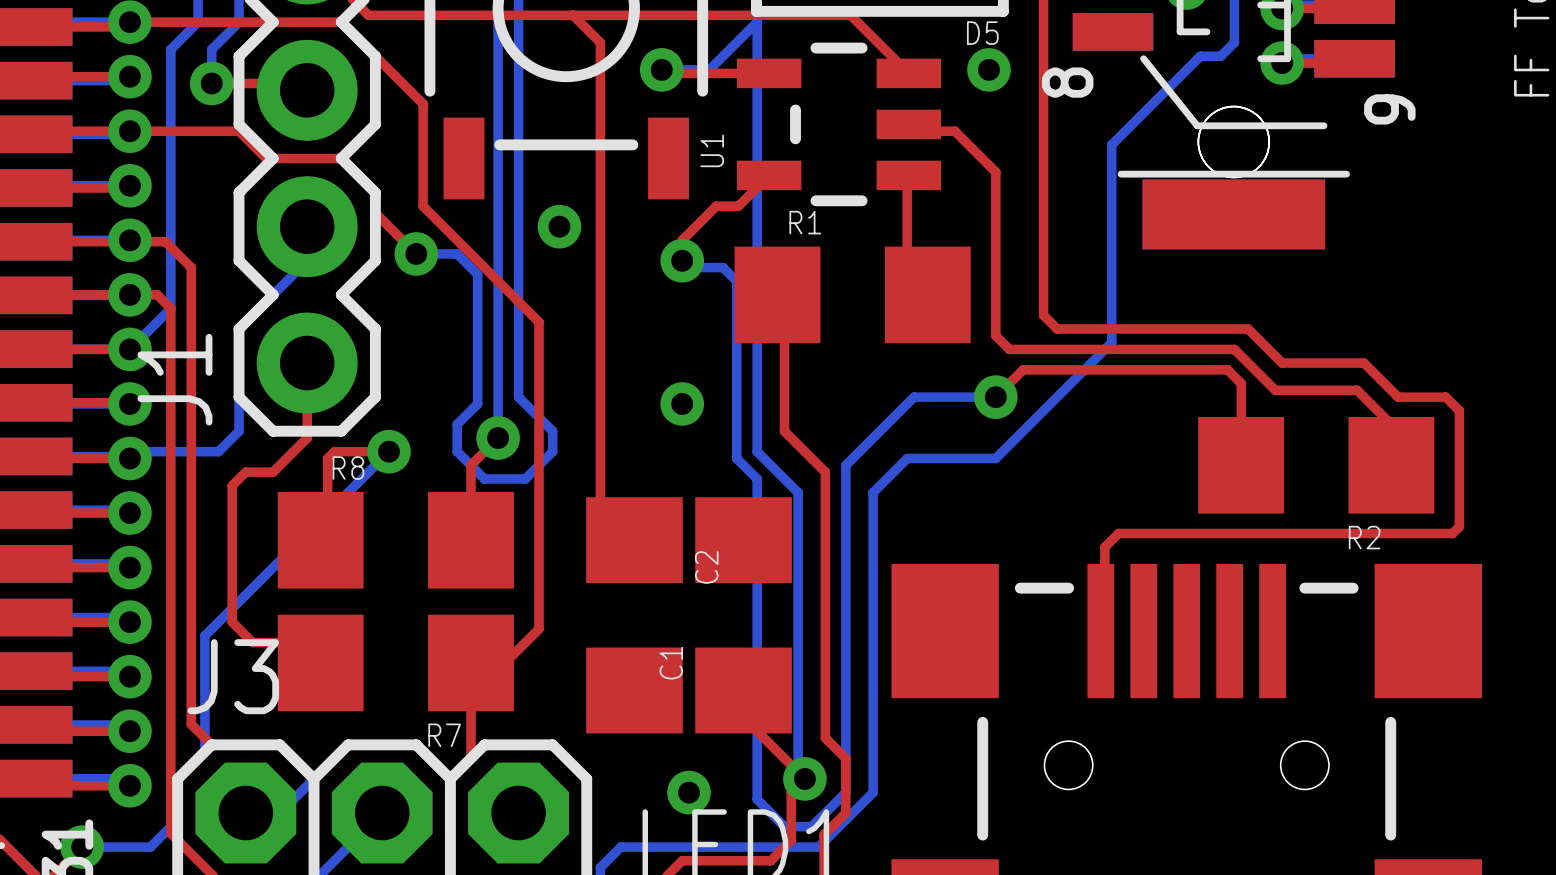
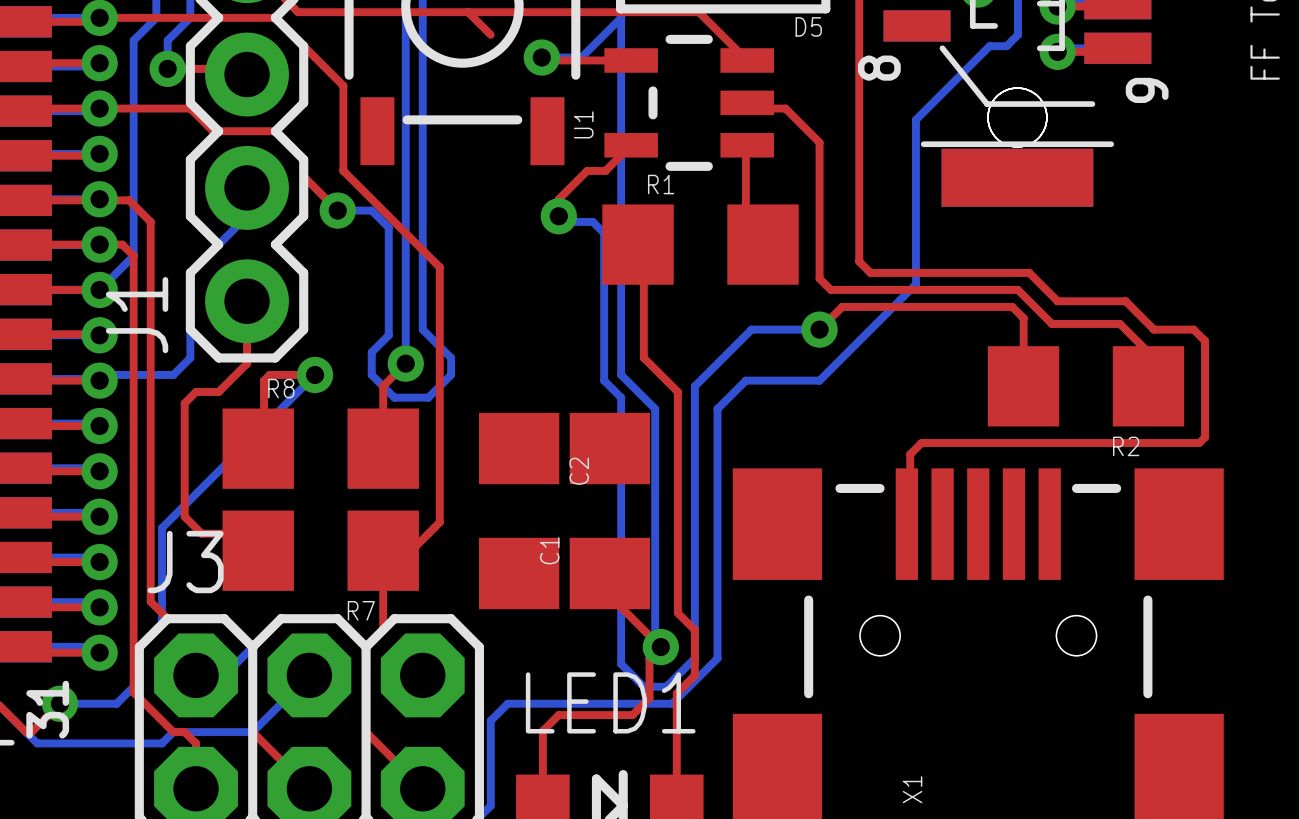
top track: (600, 42) (600, 506) (634, 540) -> none
via: (989, 69) -> none
via: (559, 226) -> none
via: (682, 403) -> none
via: (689, 792) -> none

